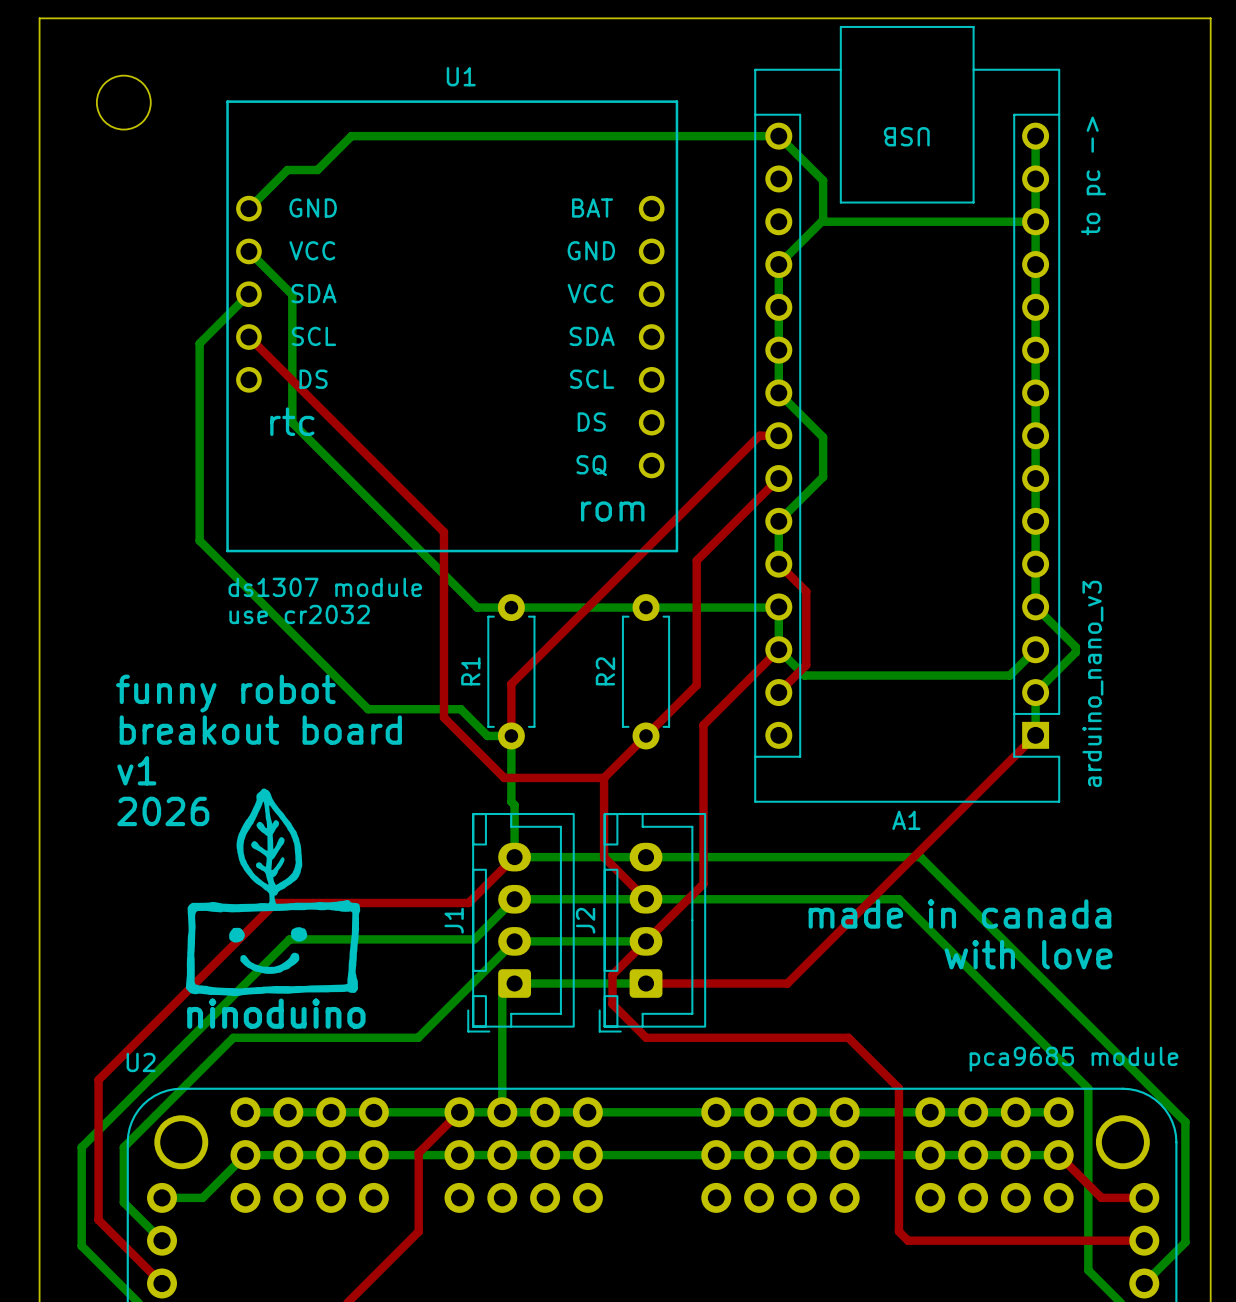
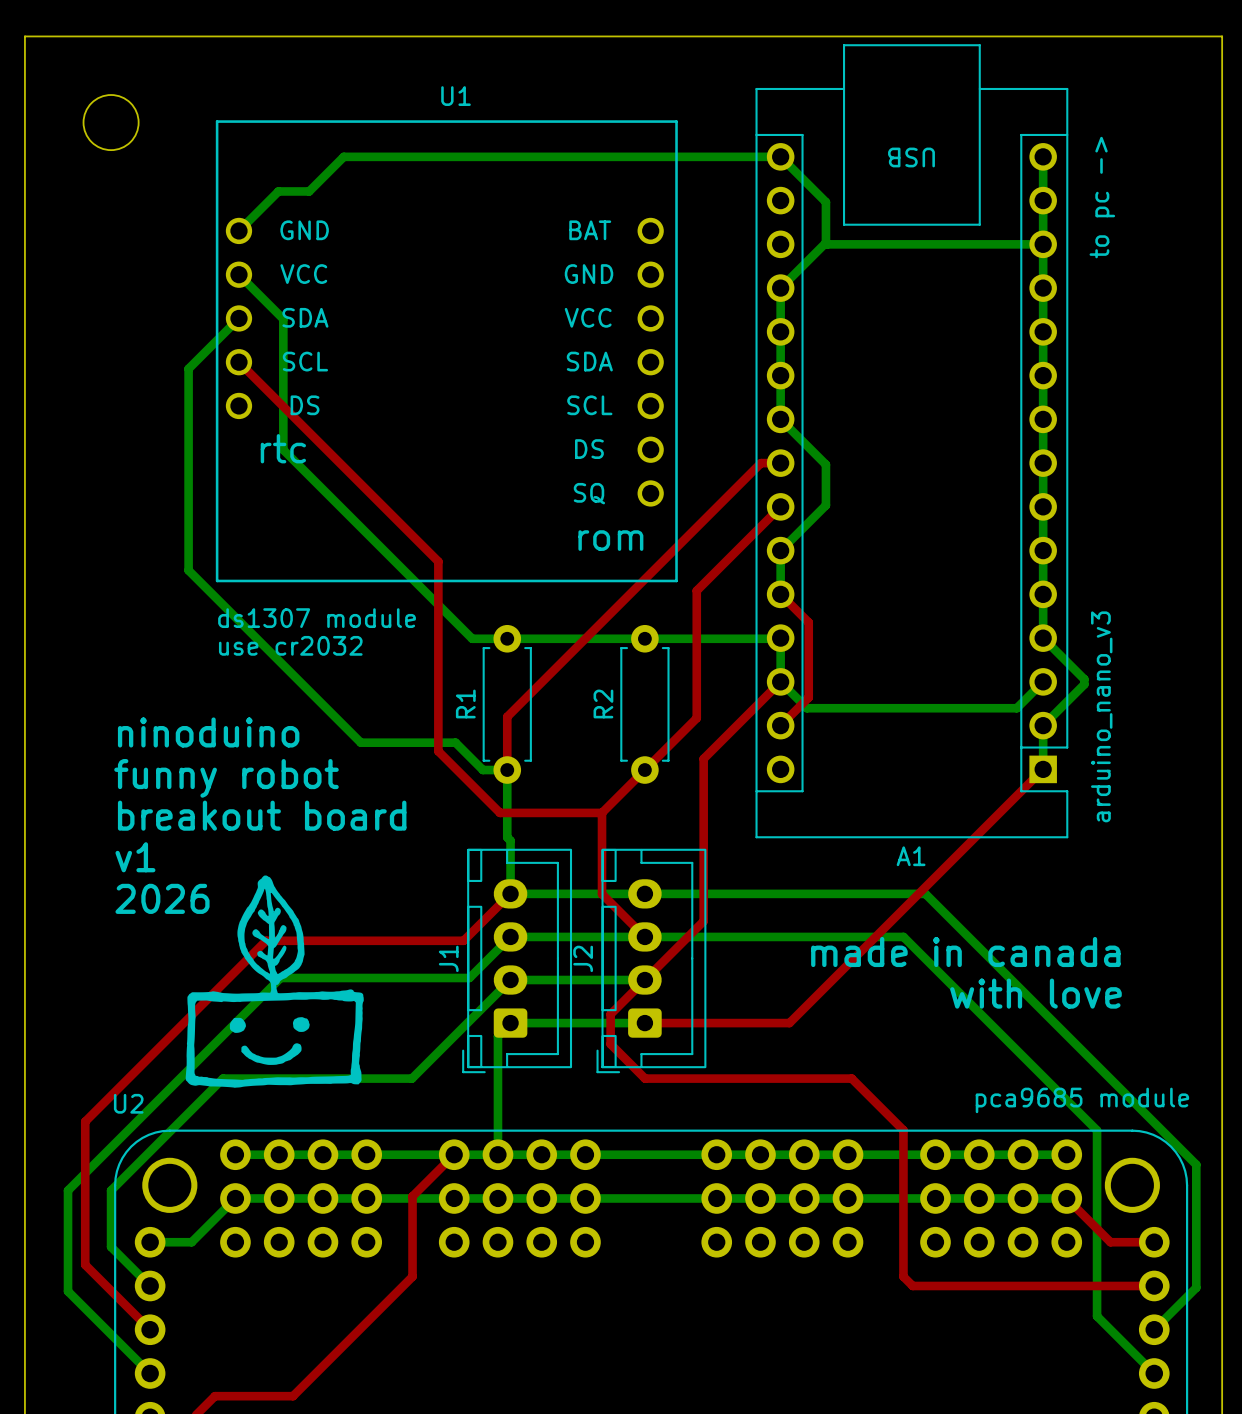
text: funny robot (225, 693) -> ninoduino (208, 732)
text: breakout board (260, 730) -> funny robot (226, 778)
text: v1 (136, 770) -> breakout board (262, 815)
text: 2026 (163, 811) -> v1 (135, 857)
text: none -> 2026 (162, 898)
drawing position: (273, 892) -> (274, 981)
text: ninoduino (276, 1013) -> none

